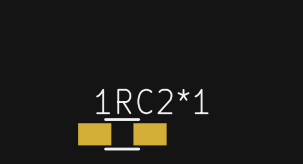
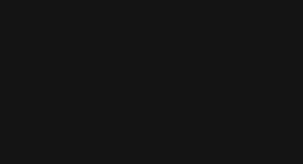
1RC2*1: (122, 134) -> none

